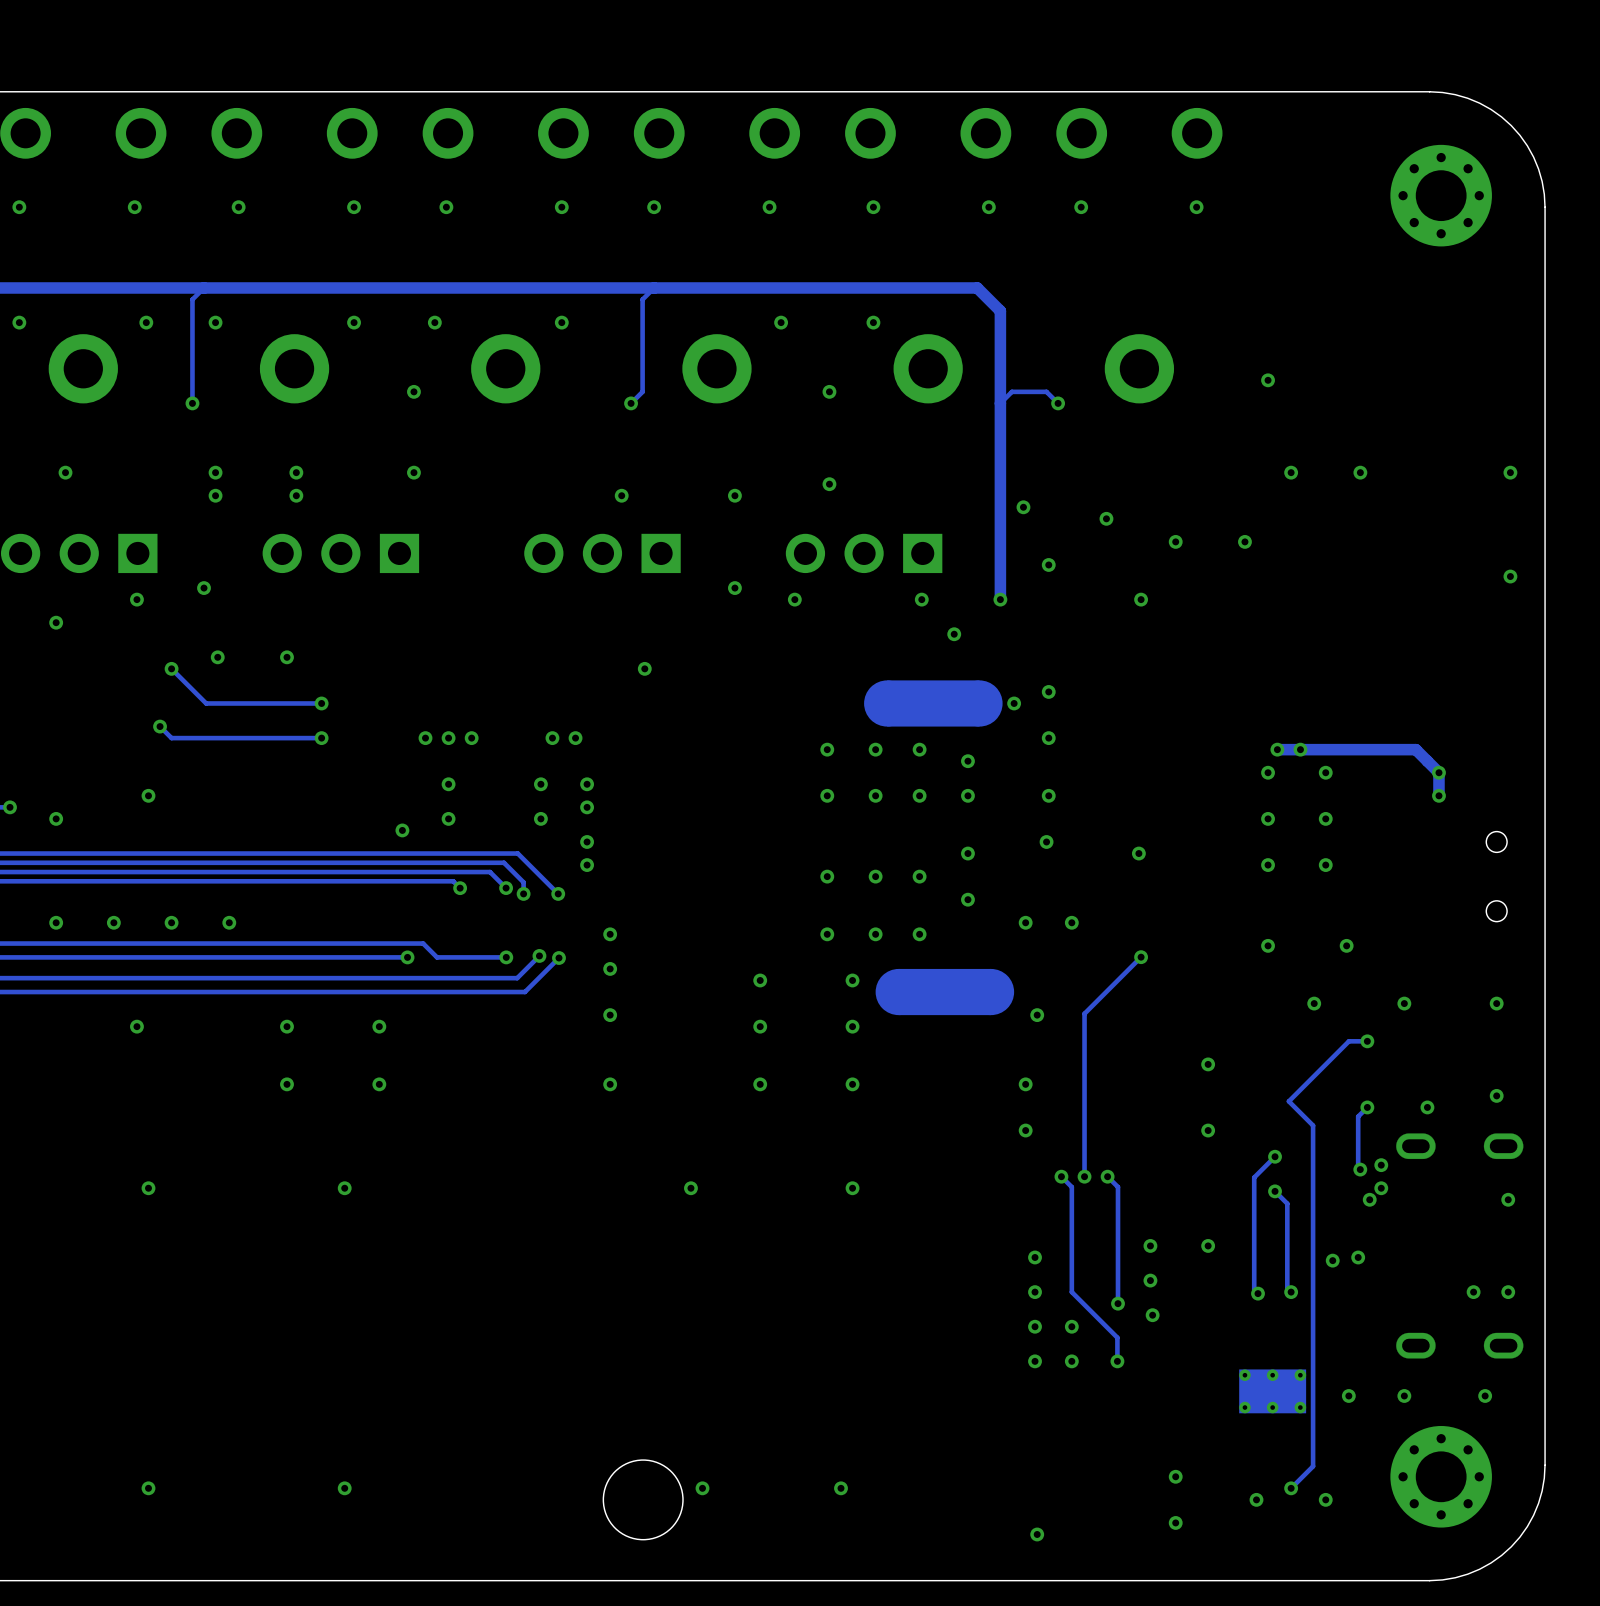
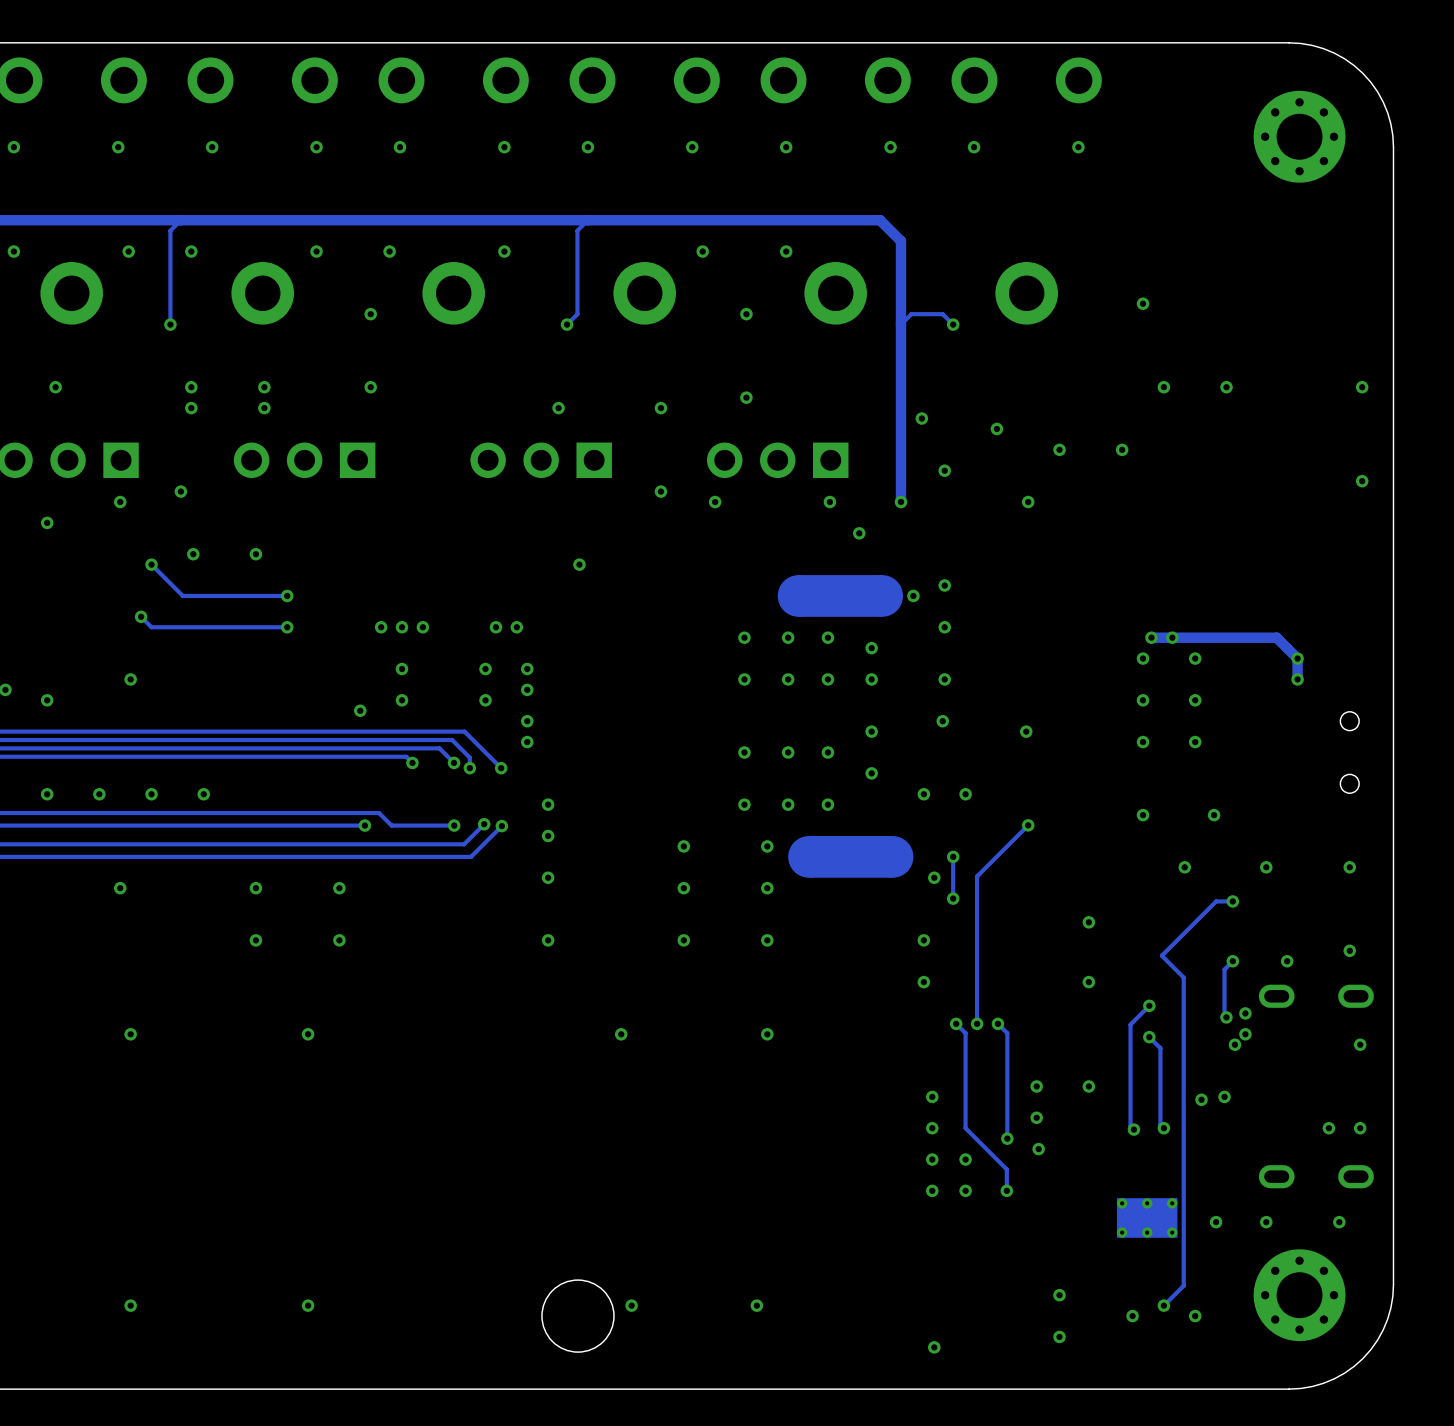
track: none -> (953, 856) (953, 898)
via: none -> (953, 856)
via: none -> (953, 898)

